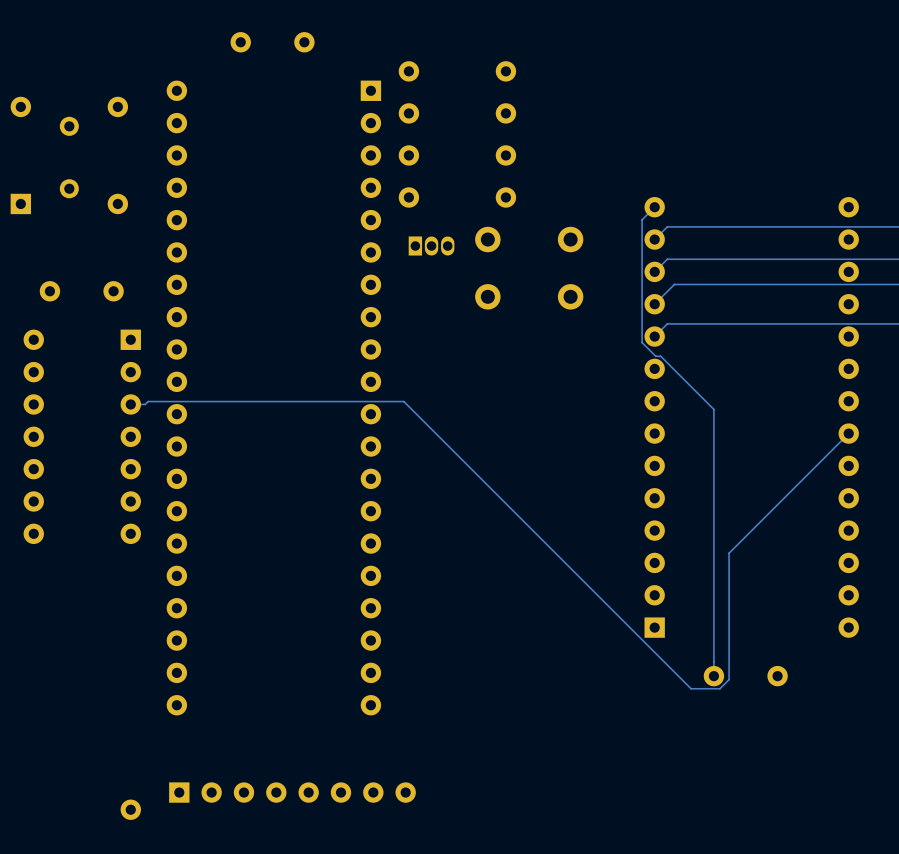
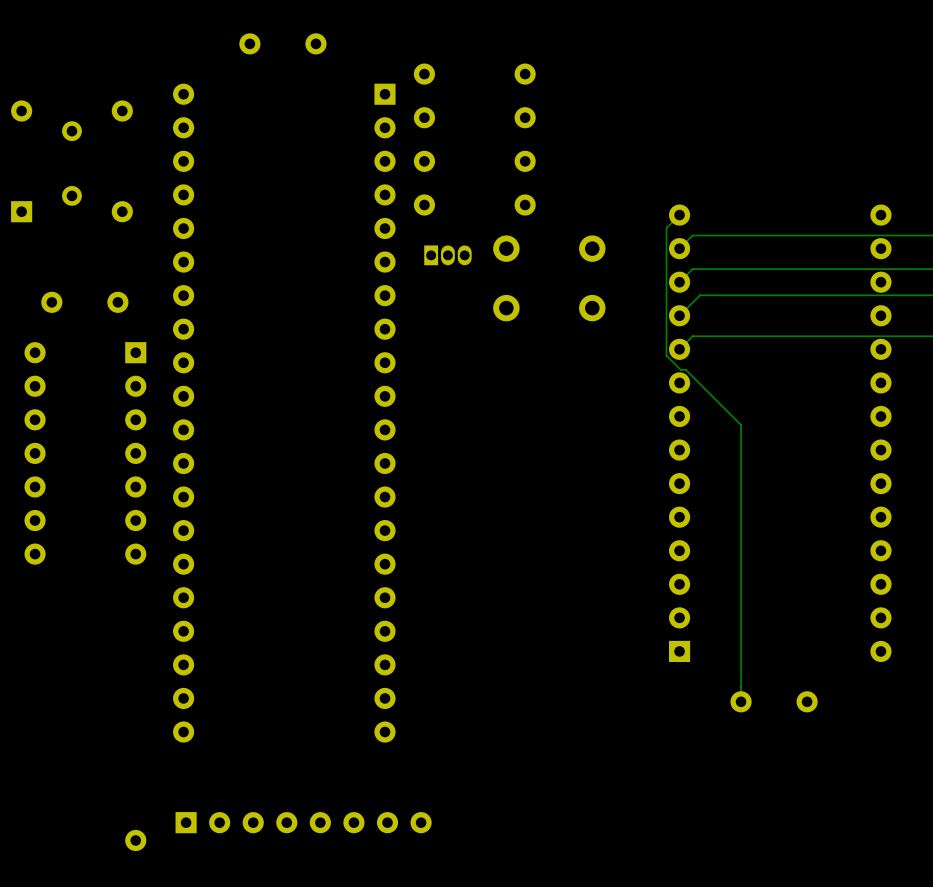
track: (130, 404) (145, 404) (148, 401) (403, 401) (691, 688) (719, 688) (729, 679) (729, 553) (848, 433) -> none

